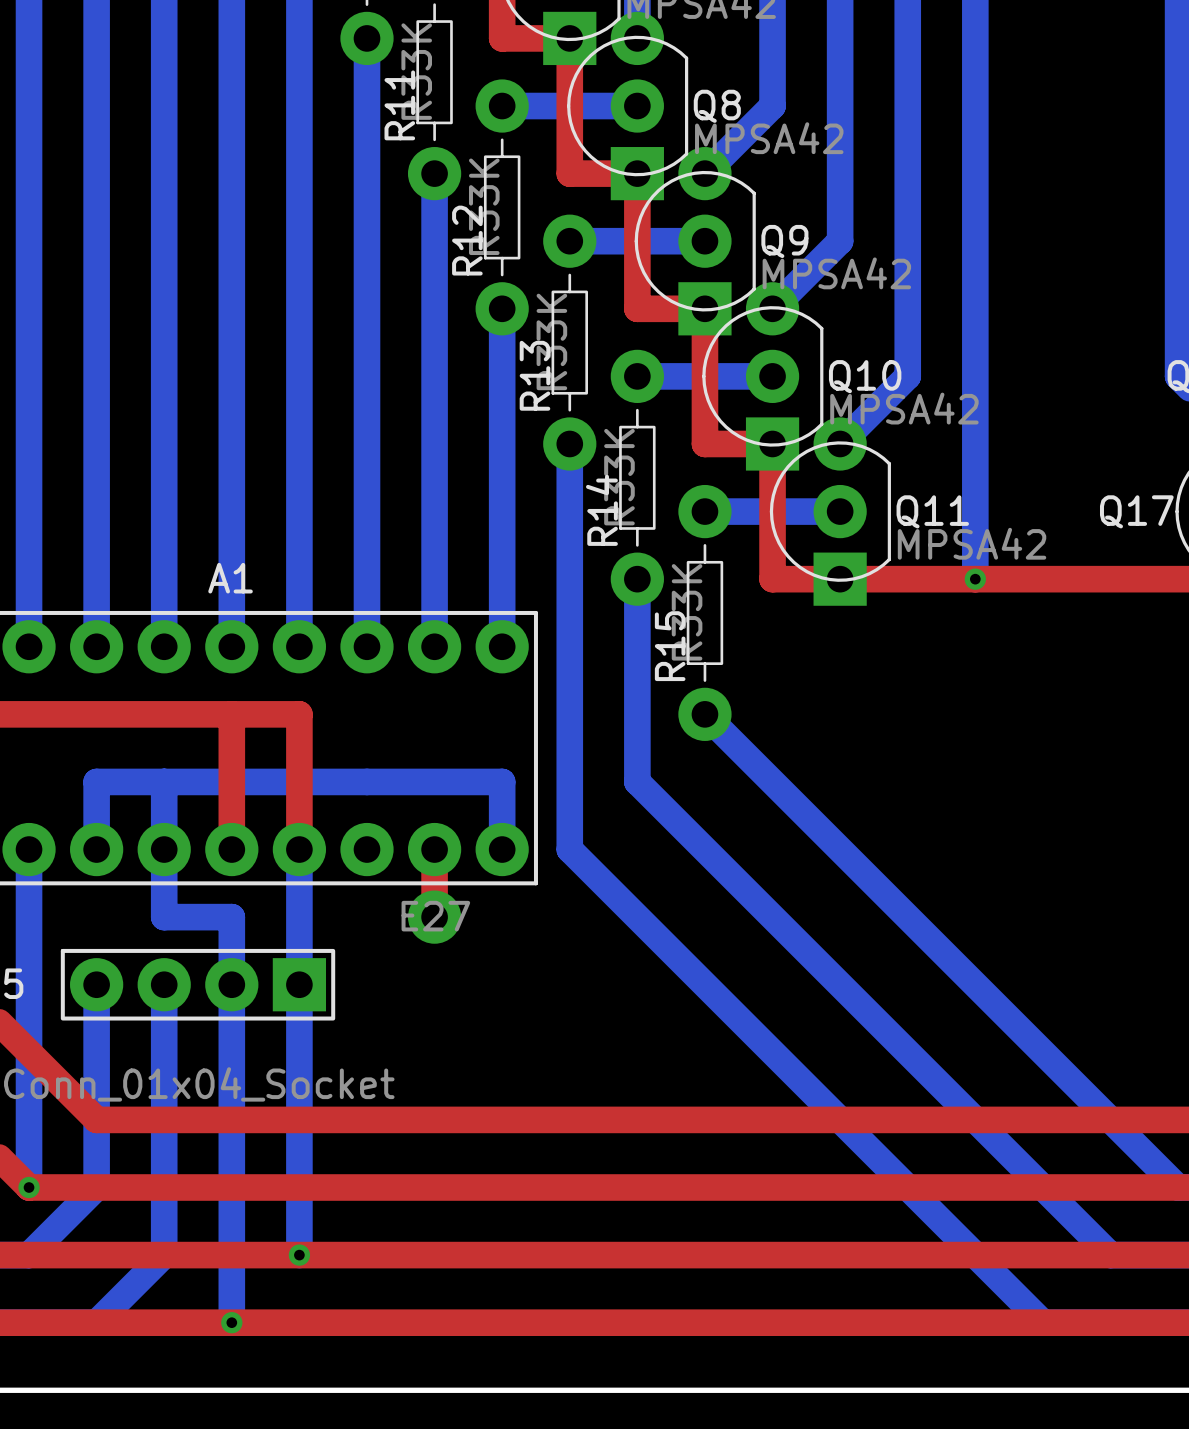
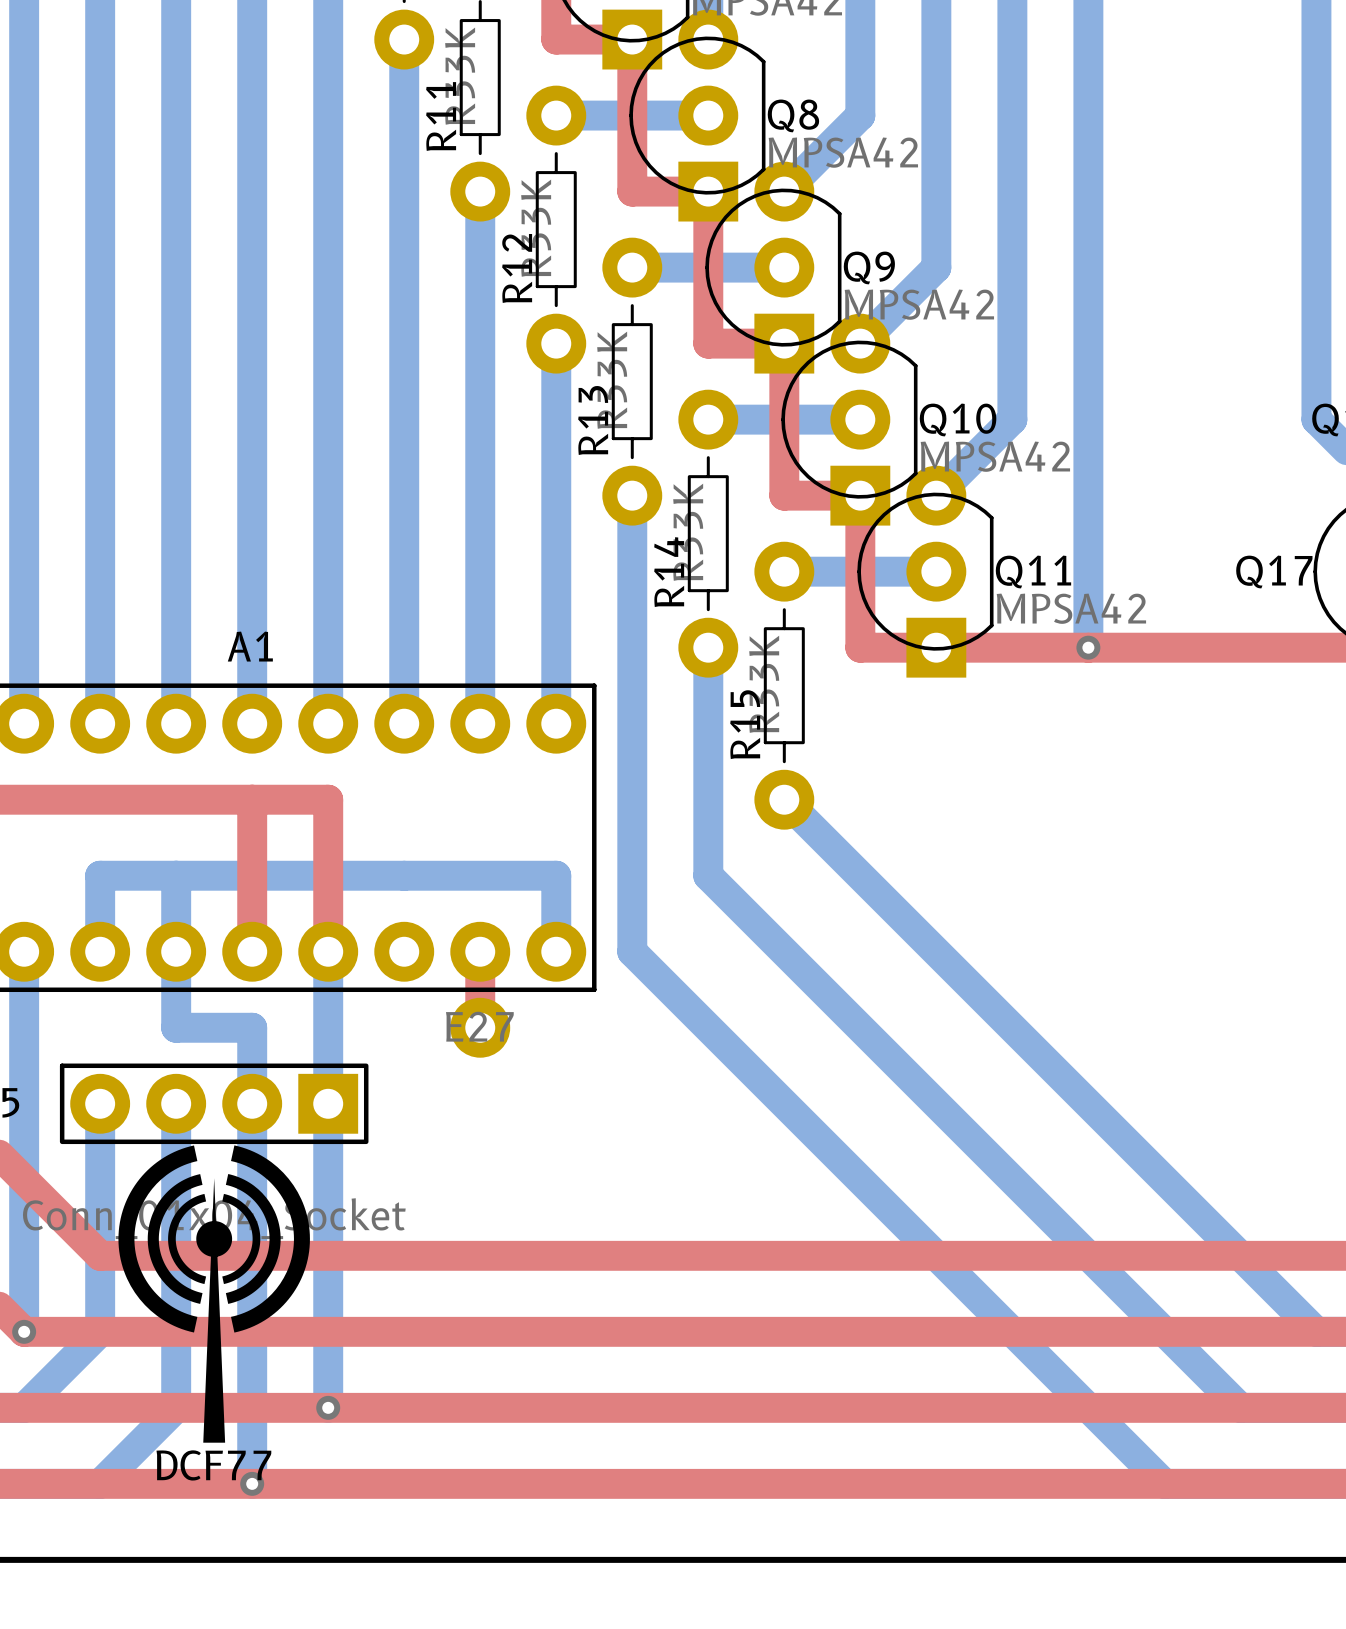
drawing: none -> [118, 1145, 310, 1443]
text: none -> DCF77 (213, 1465)

